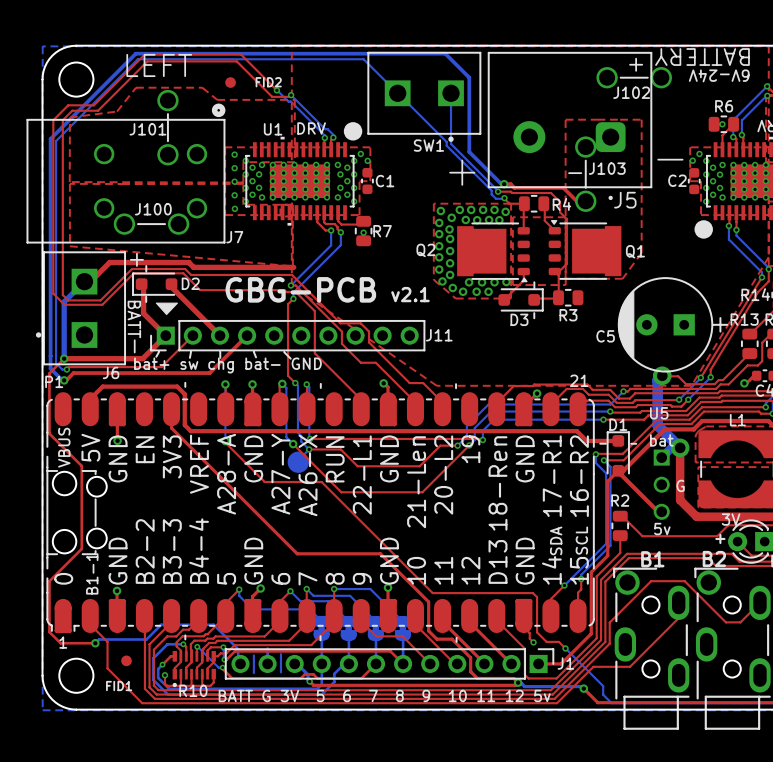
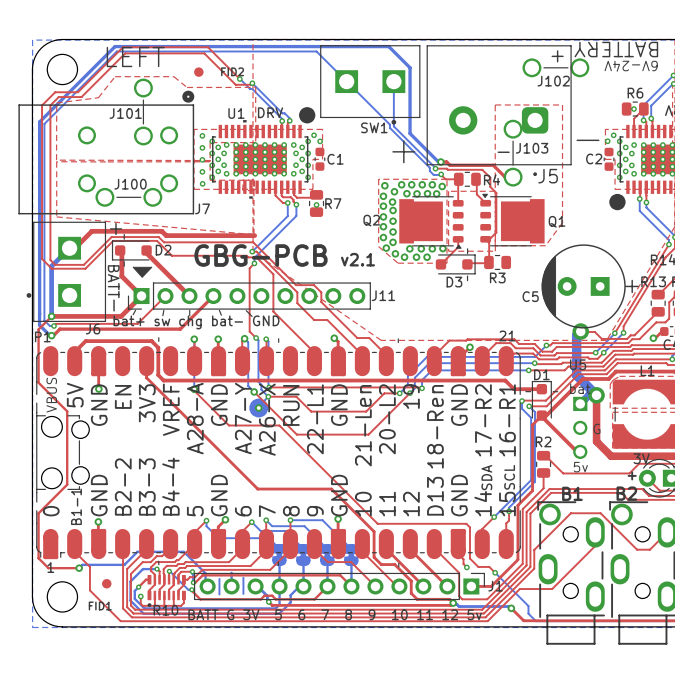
via: none -> (258, 408)
text: 17-R1 (552, 476) -> 17-R2 (483, 420)
text: 16-R2 (579, 476) -> 16-R1 (507, 420)

